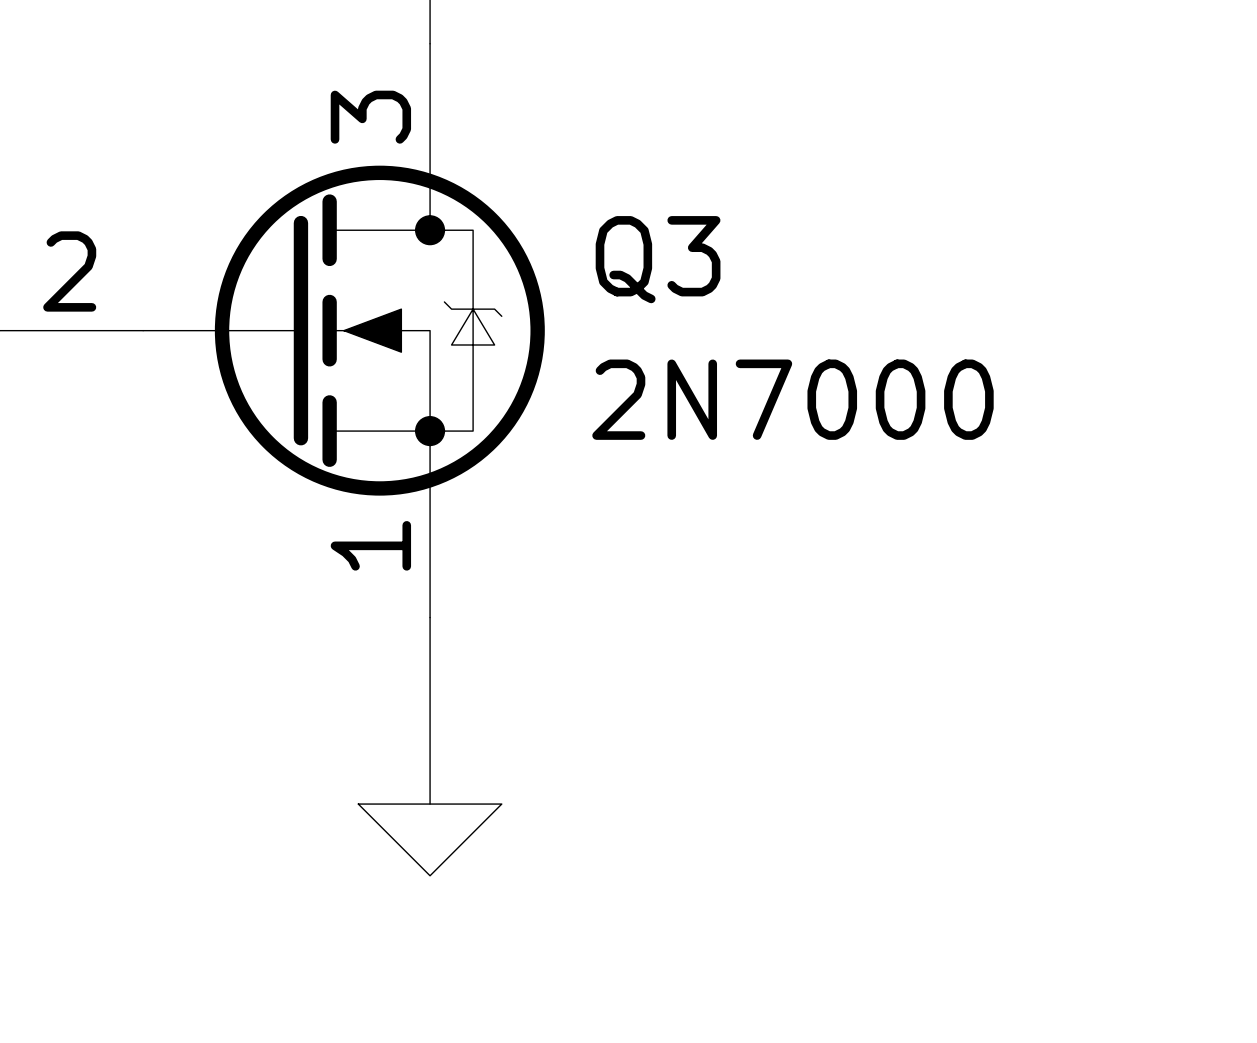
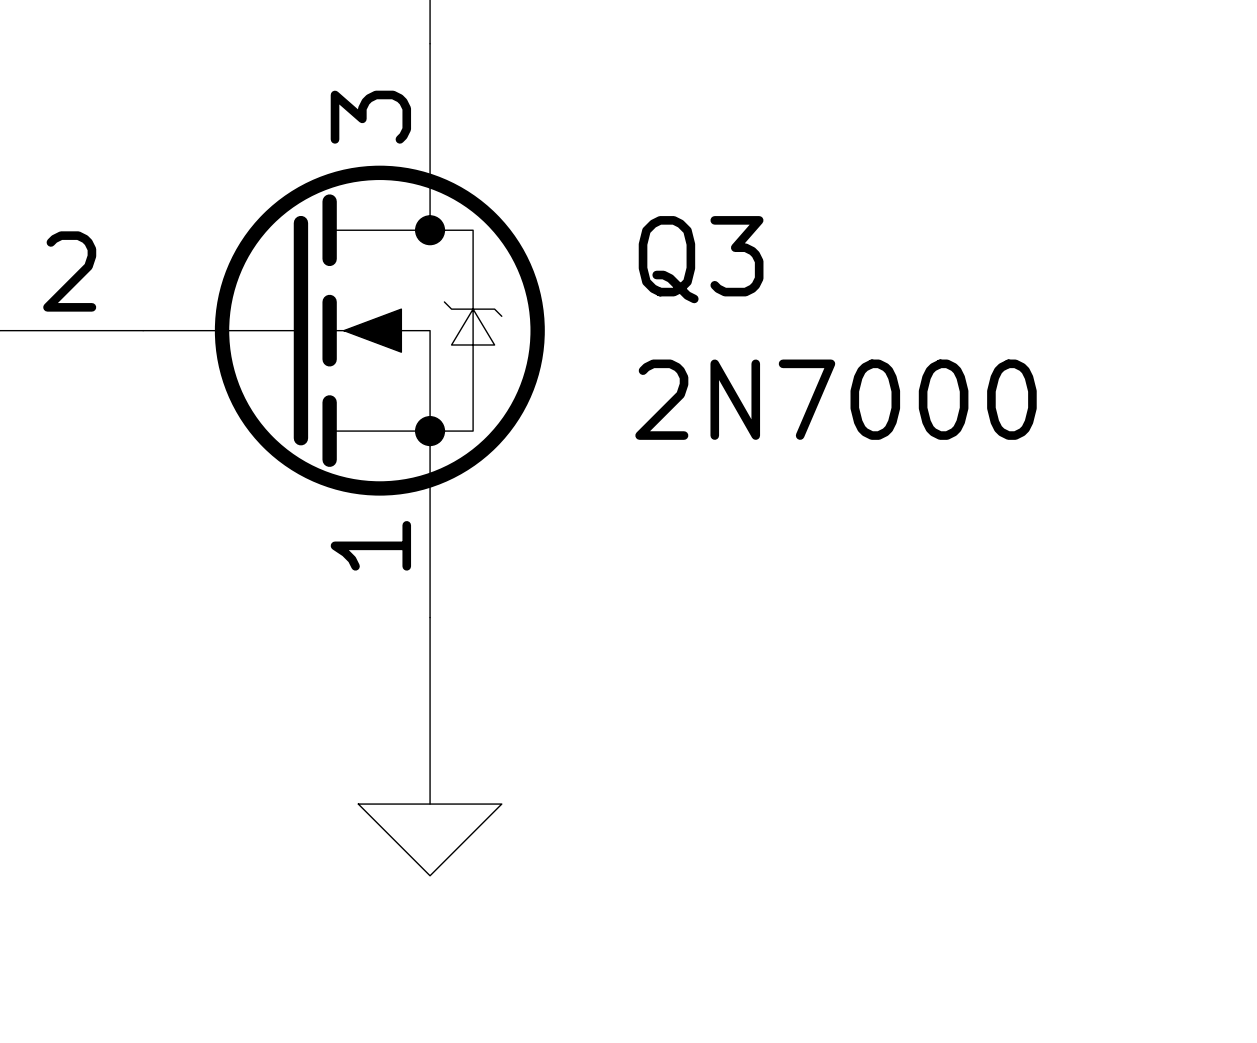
Q3 name position: Q3 (658, 259) -> Q3 (701, 259)
Q3 value position: 2N7000 (792, 399) -> 2N7000 (836, 399)

